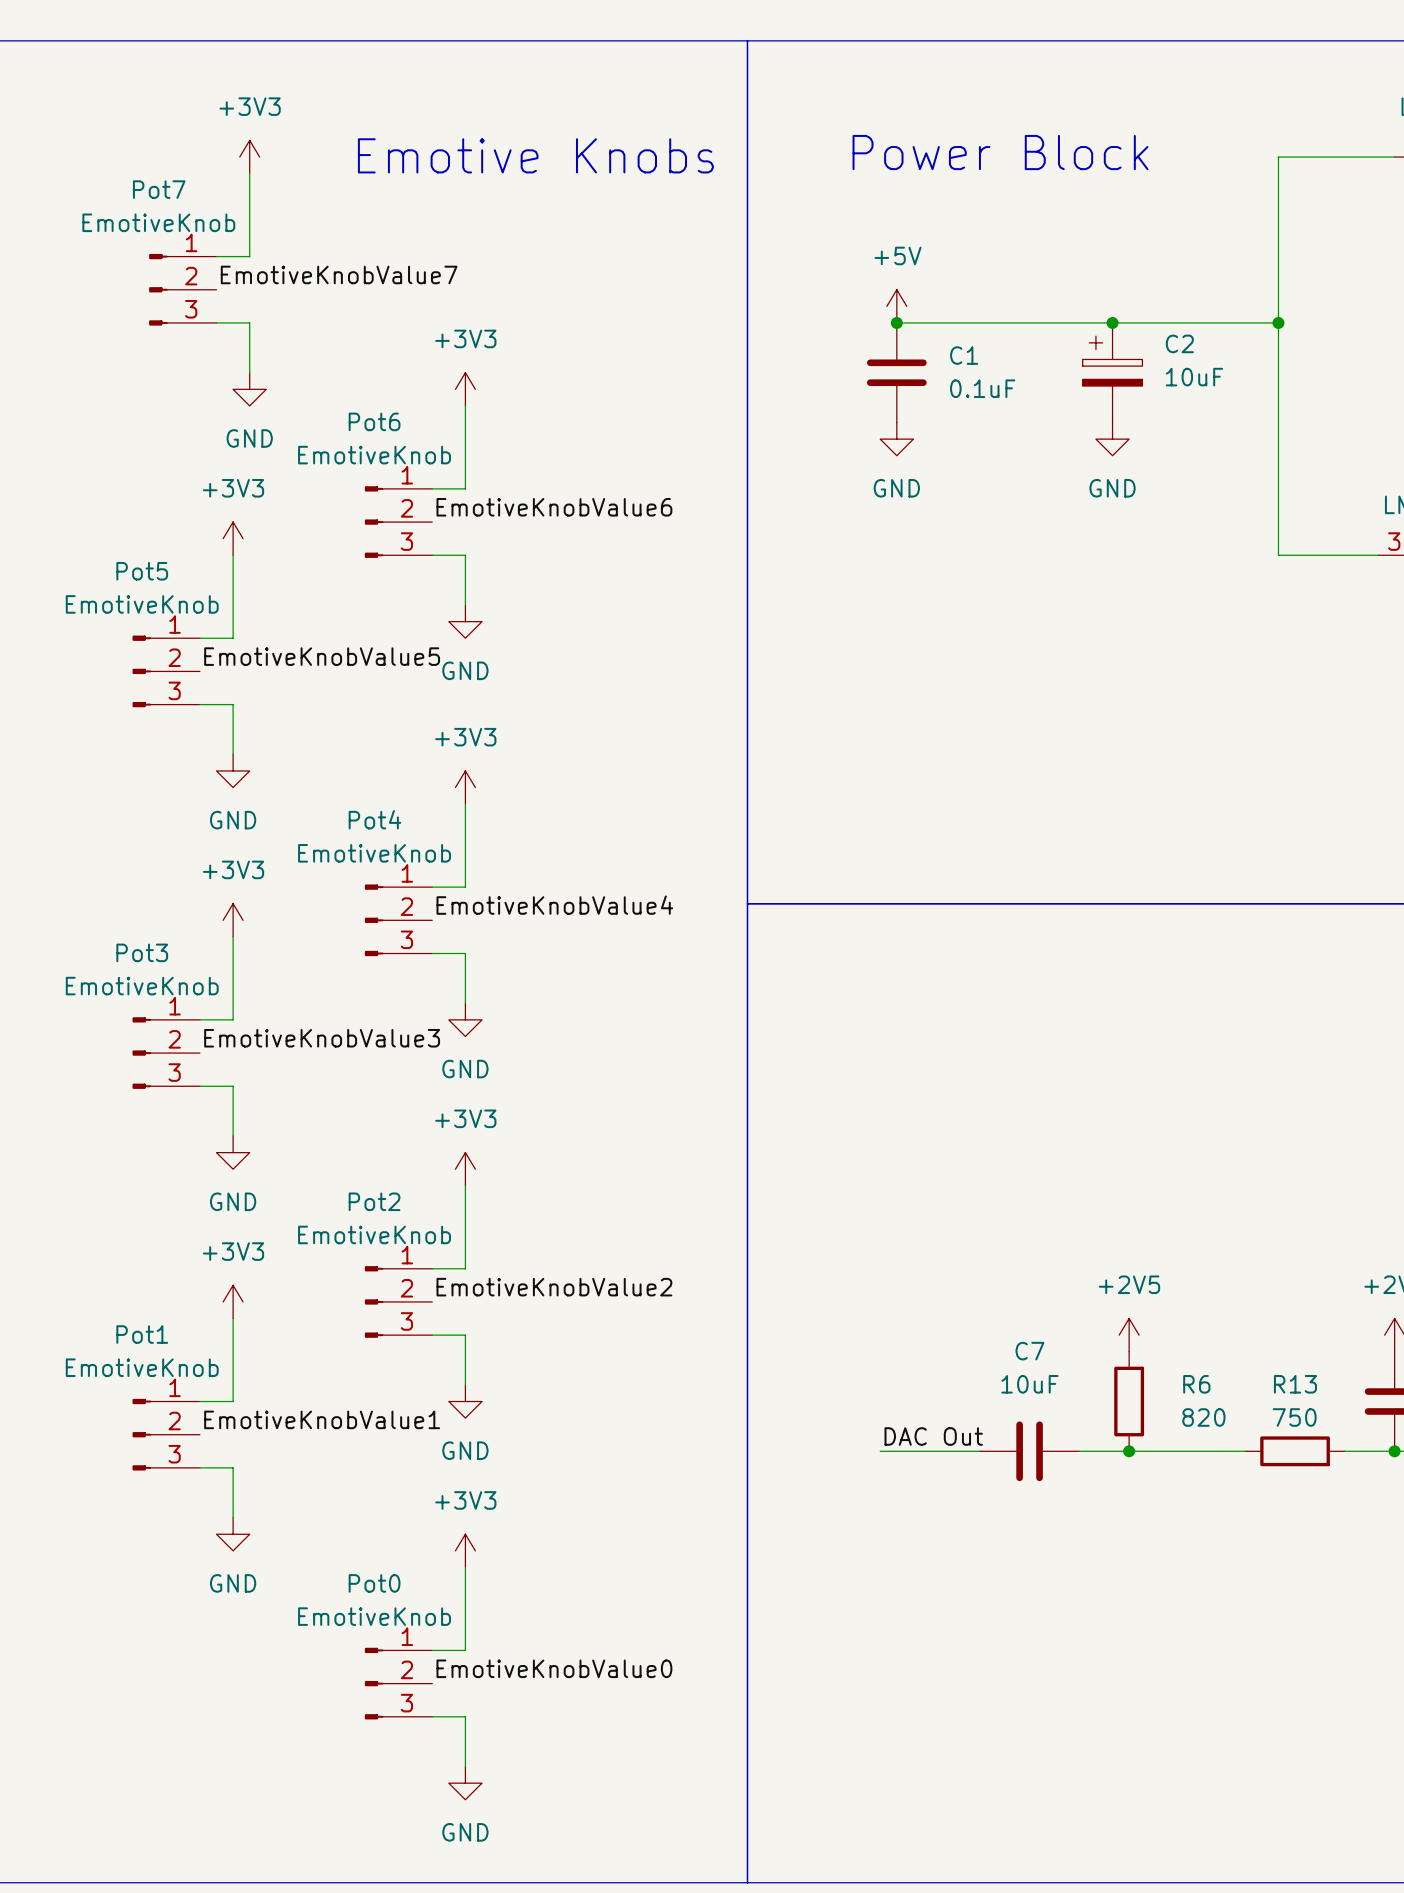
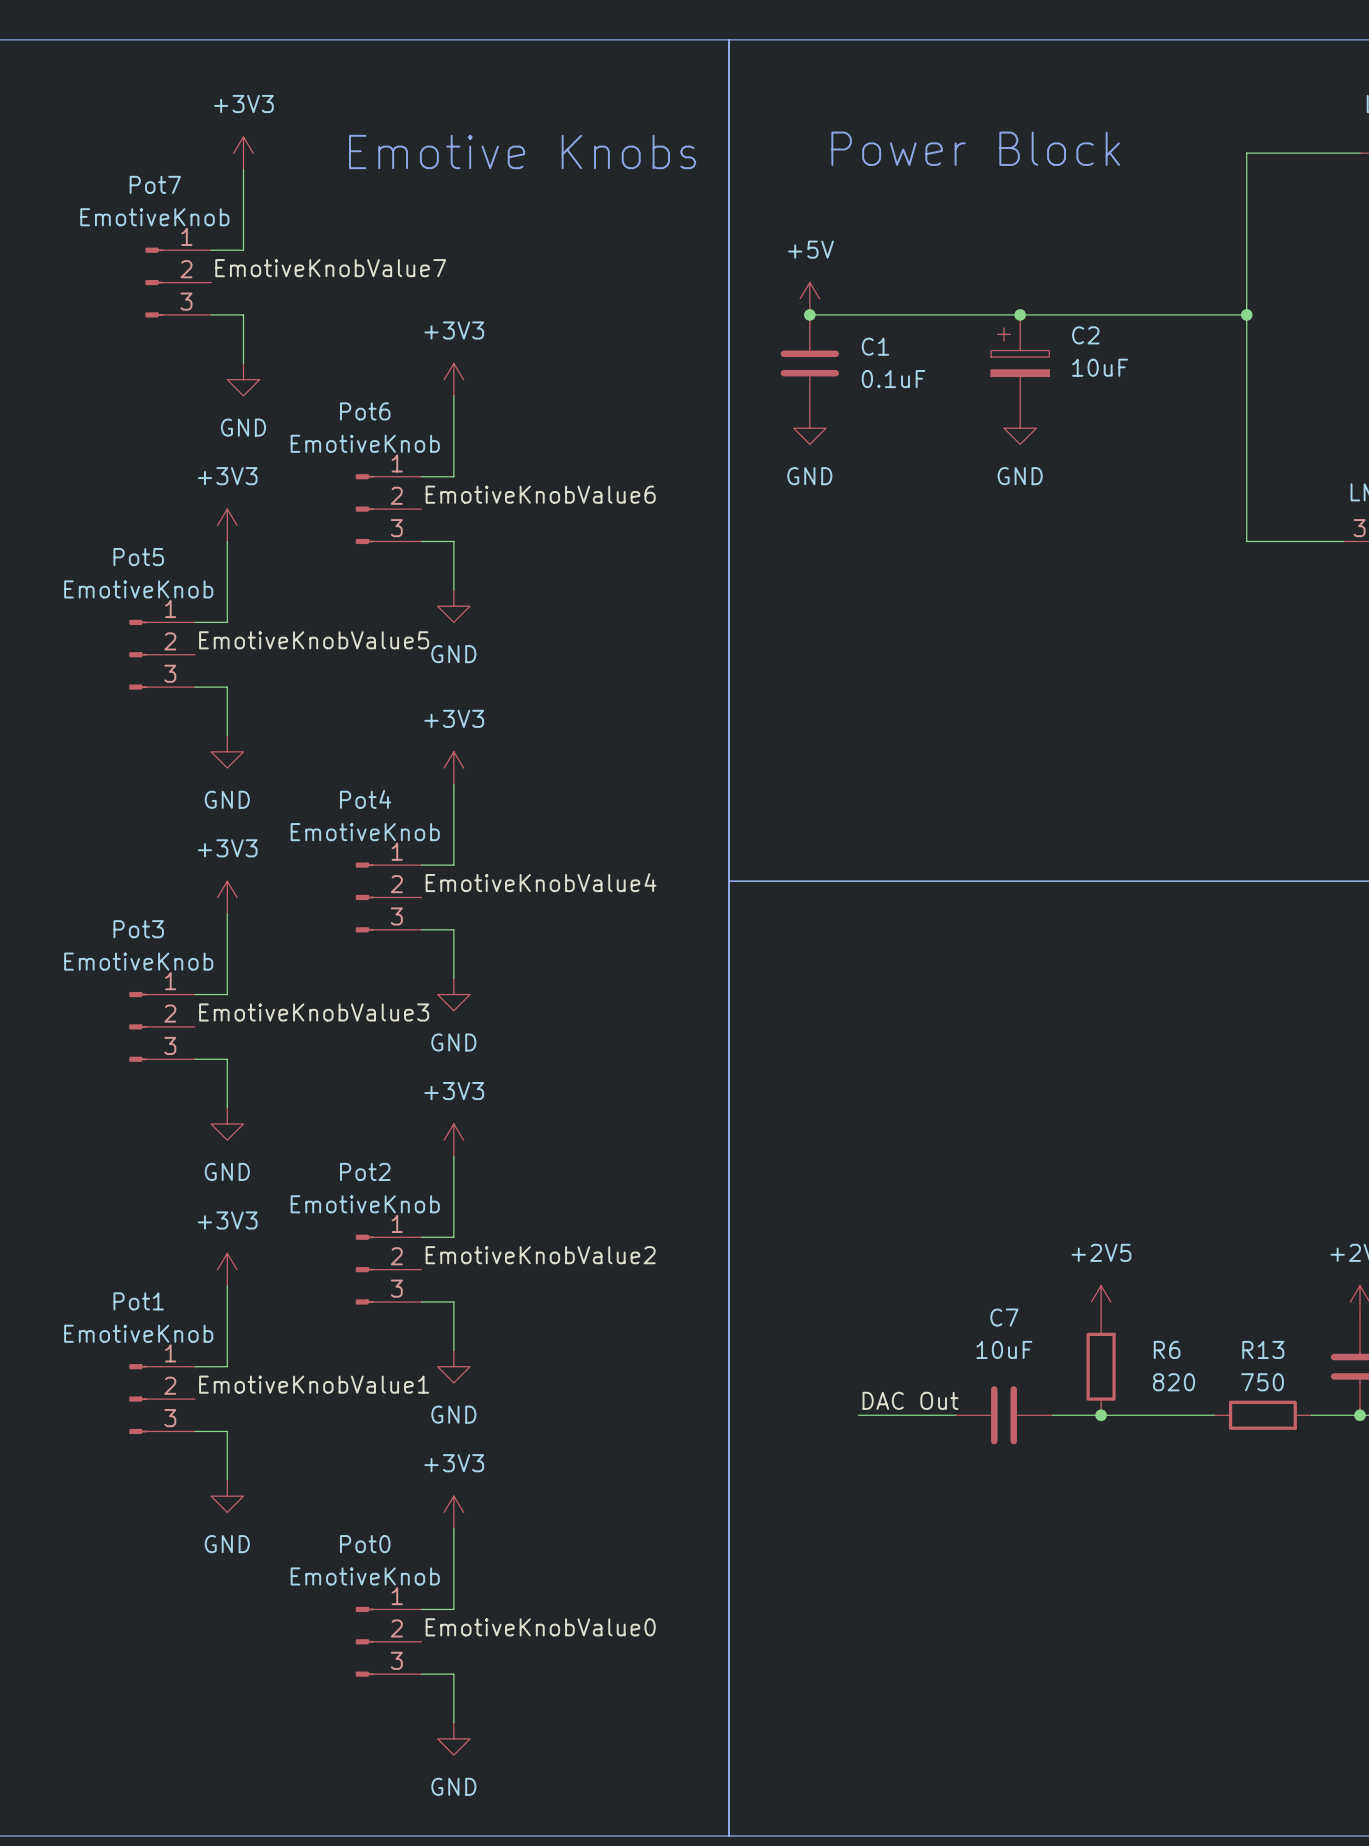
power symbol position: +5V (896, 306) -> +5V (809, 298)
wire: none -> (809, 314) (874, 314)
junction position: (896, 322) -> (809, 314)
junction position: (1112, 322) -> (1020, 314)
C1 position: (896, 372) -> (809, 363)
C2 position: (1112, 372) -> (1020, 363)
power symbol position: GND (896, 439) -> GND (809, 428)
power symbol position: GND (1112, 439) -> GND (1020, 428)

